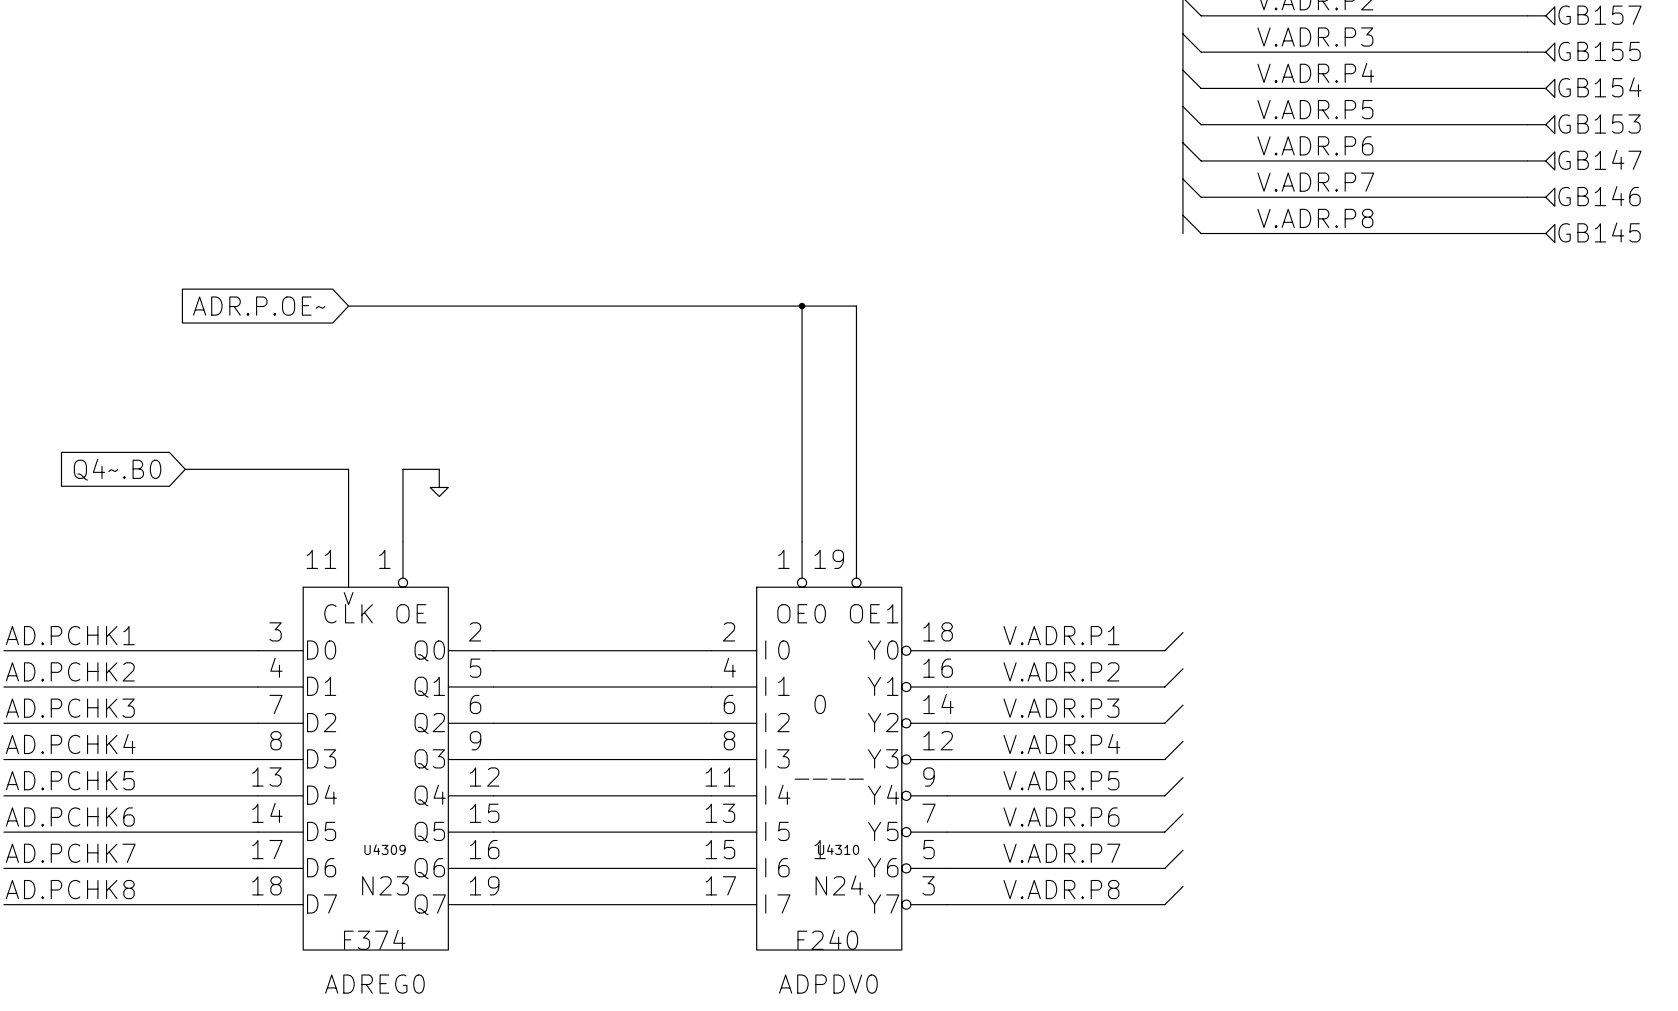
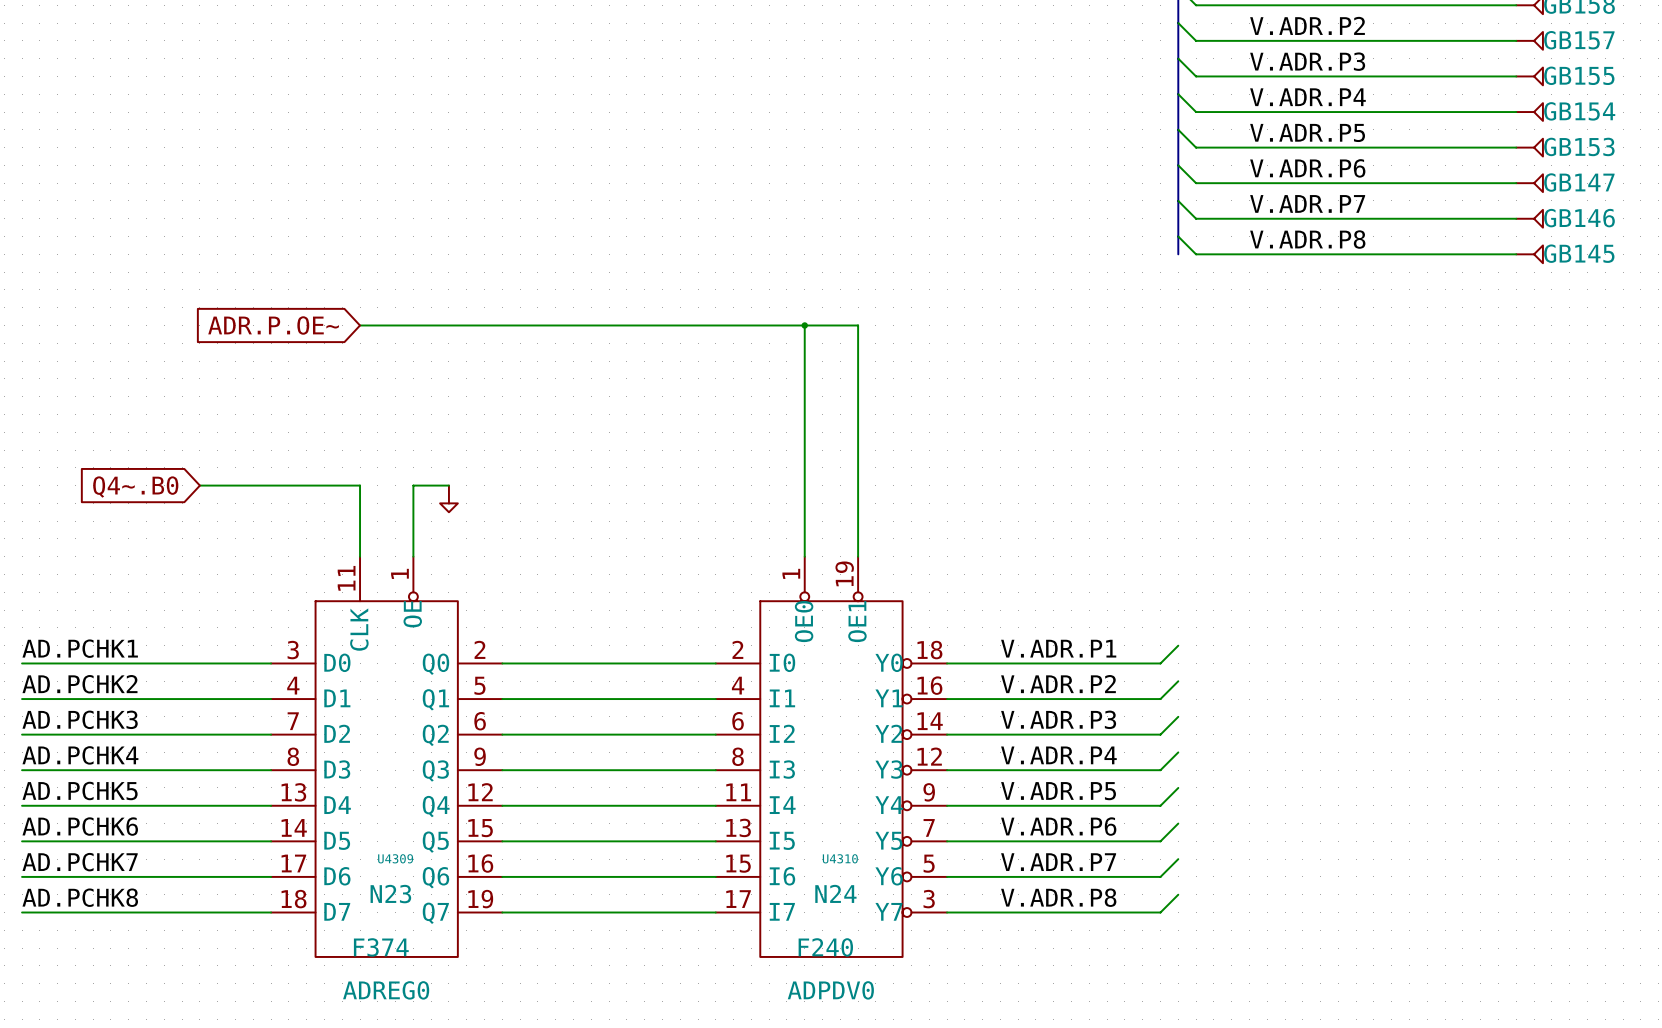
U4309 symbol: [257, 541, 494, 951] -> [271, 556, 503, 957]
U4310 symbol: [711, 541, 948, 951] -> [715, 556, 948, 957]

